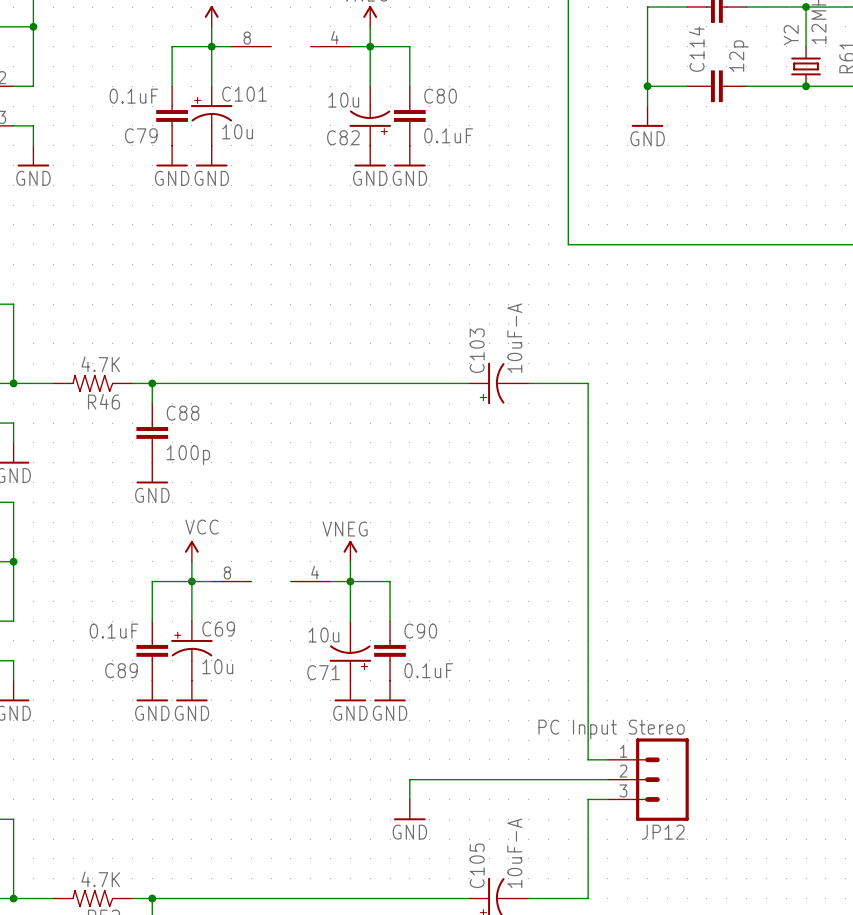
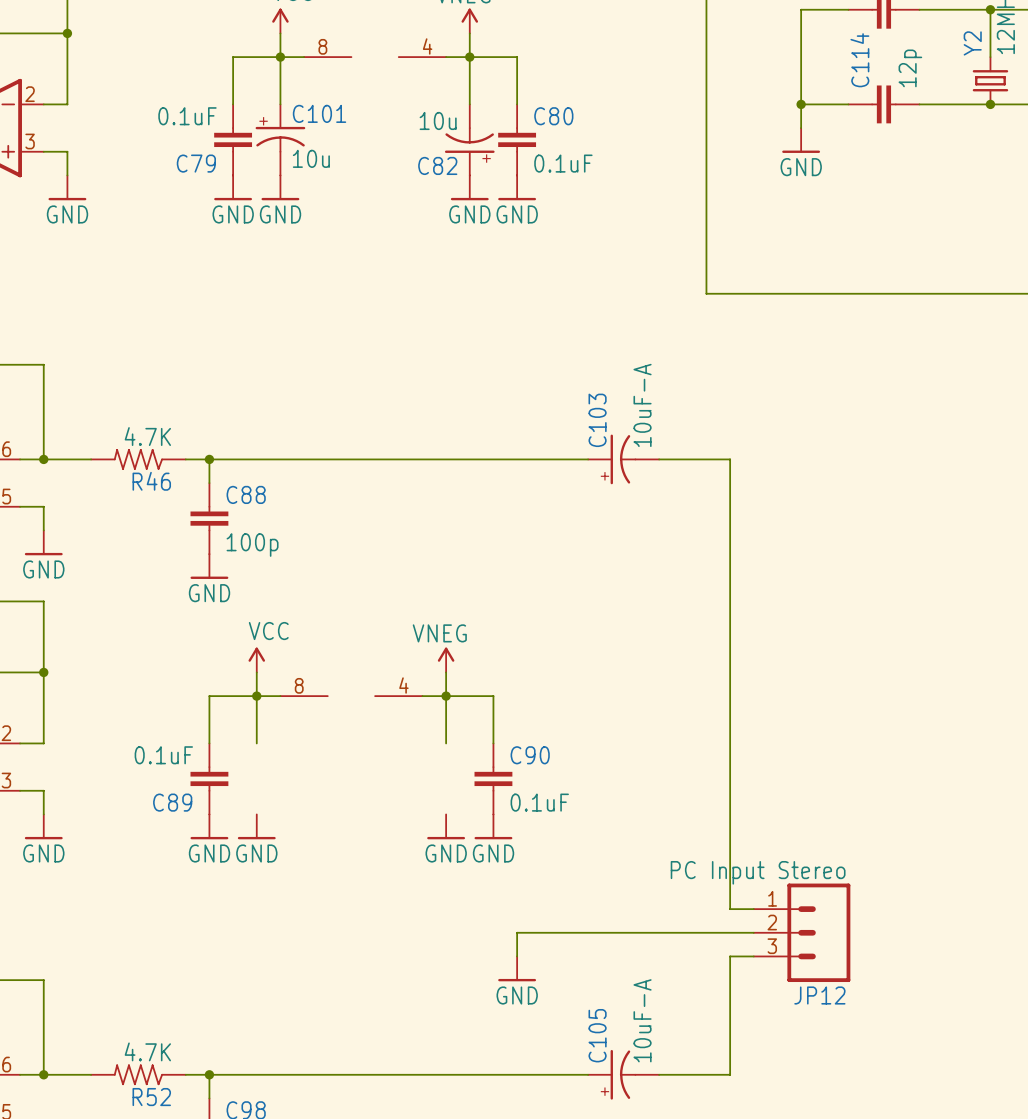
C69: 10u (191, 650) -> none
C71: 10u (350, 650) -> none

